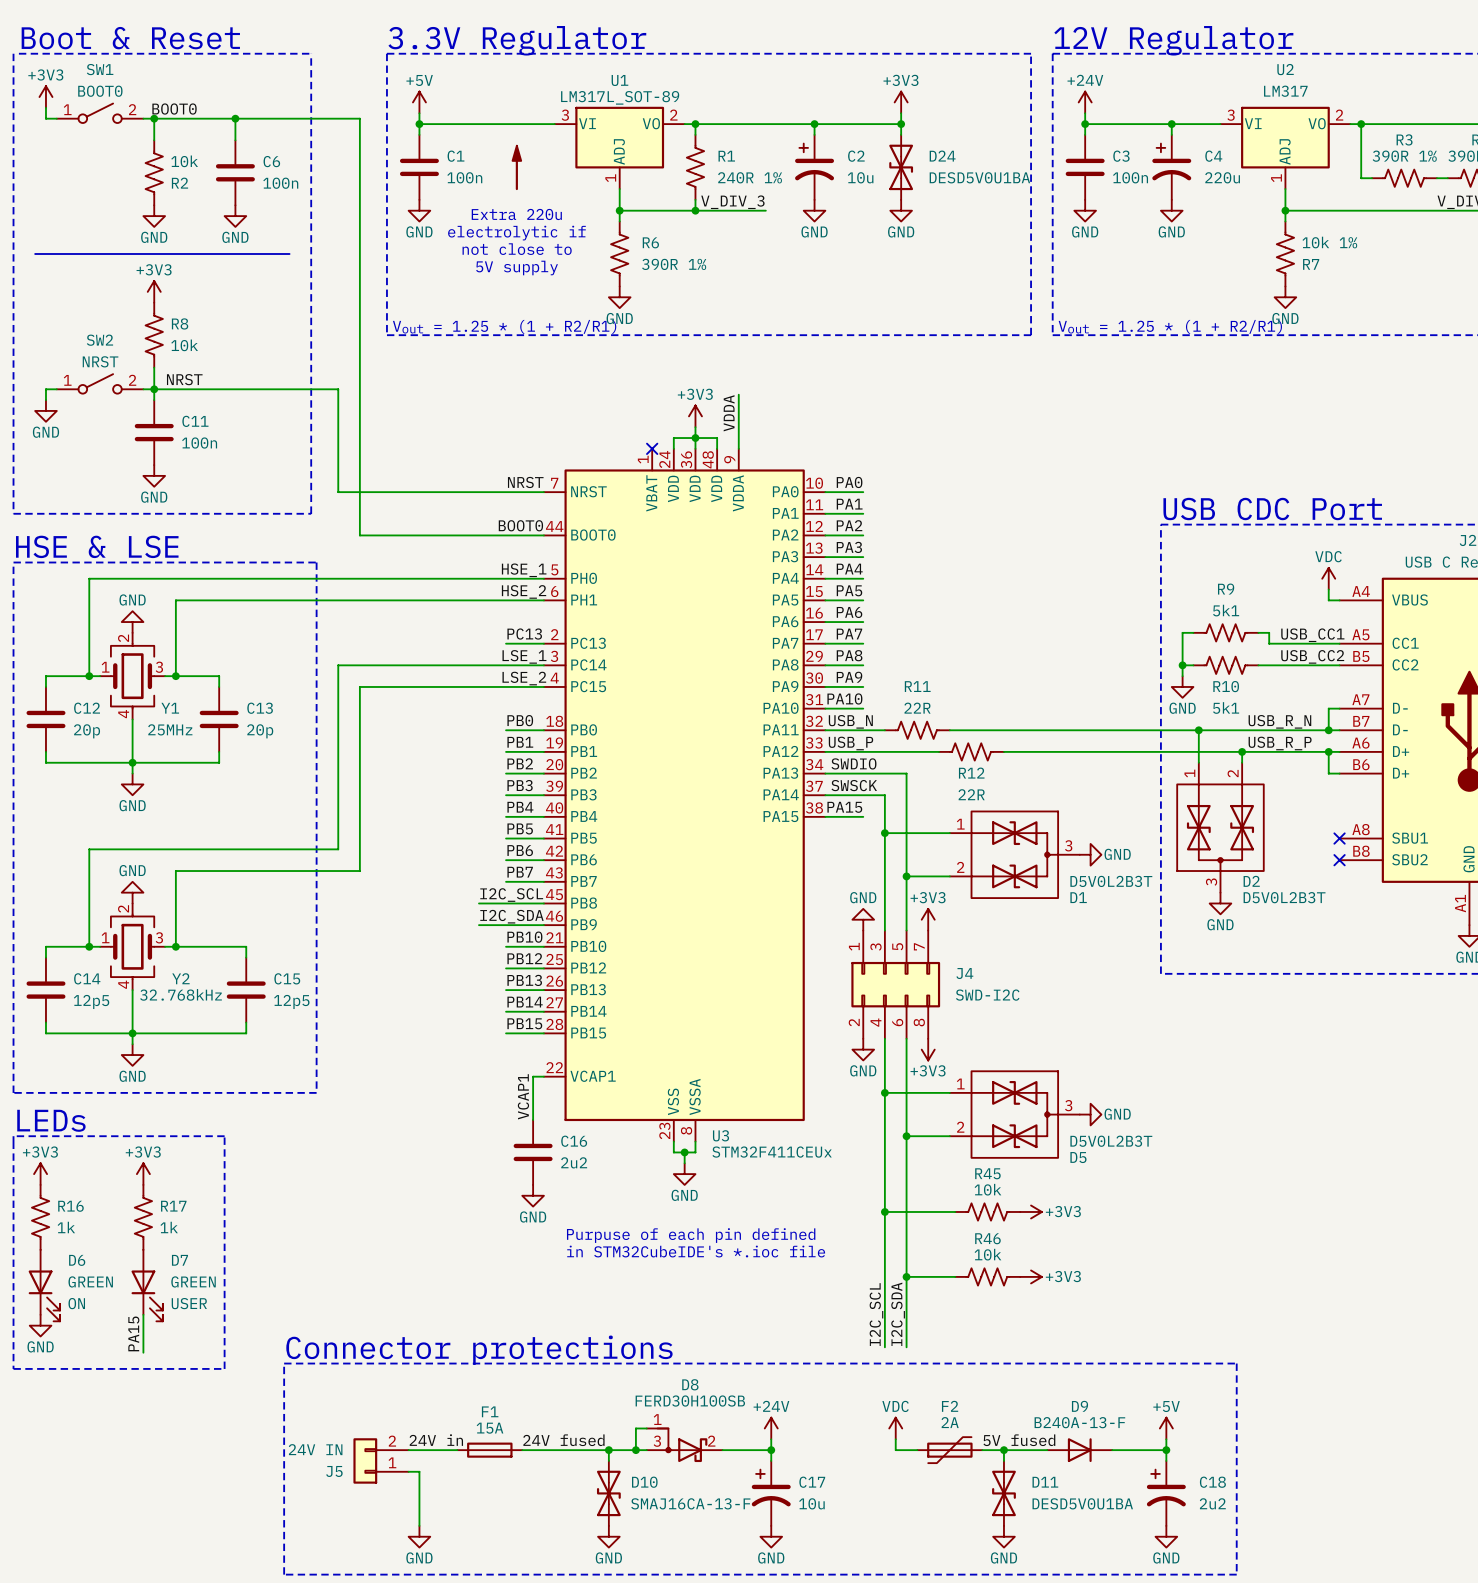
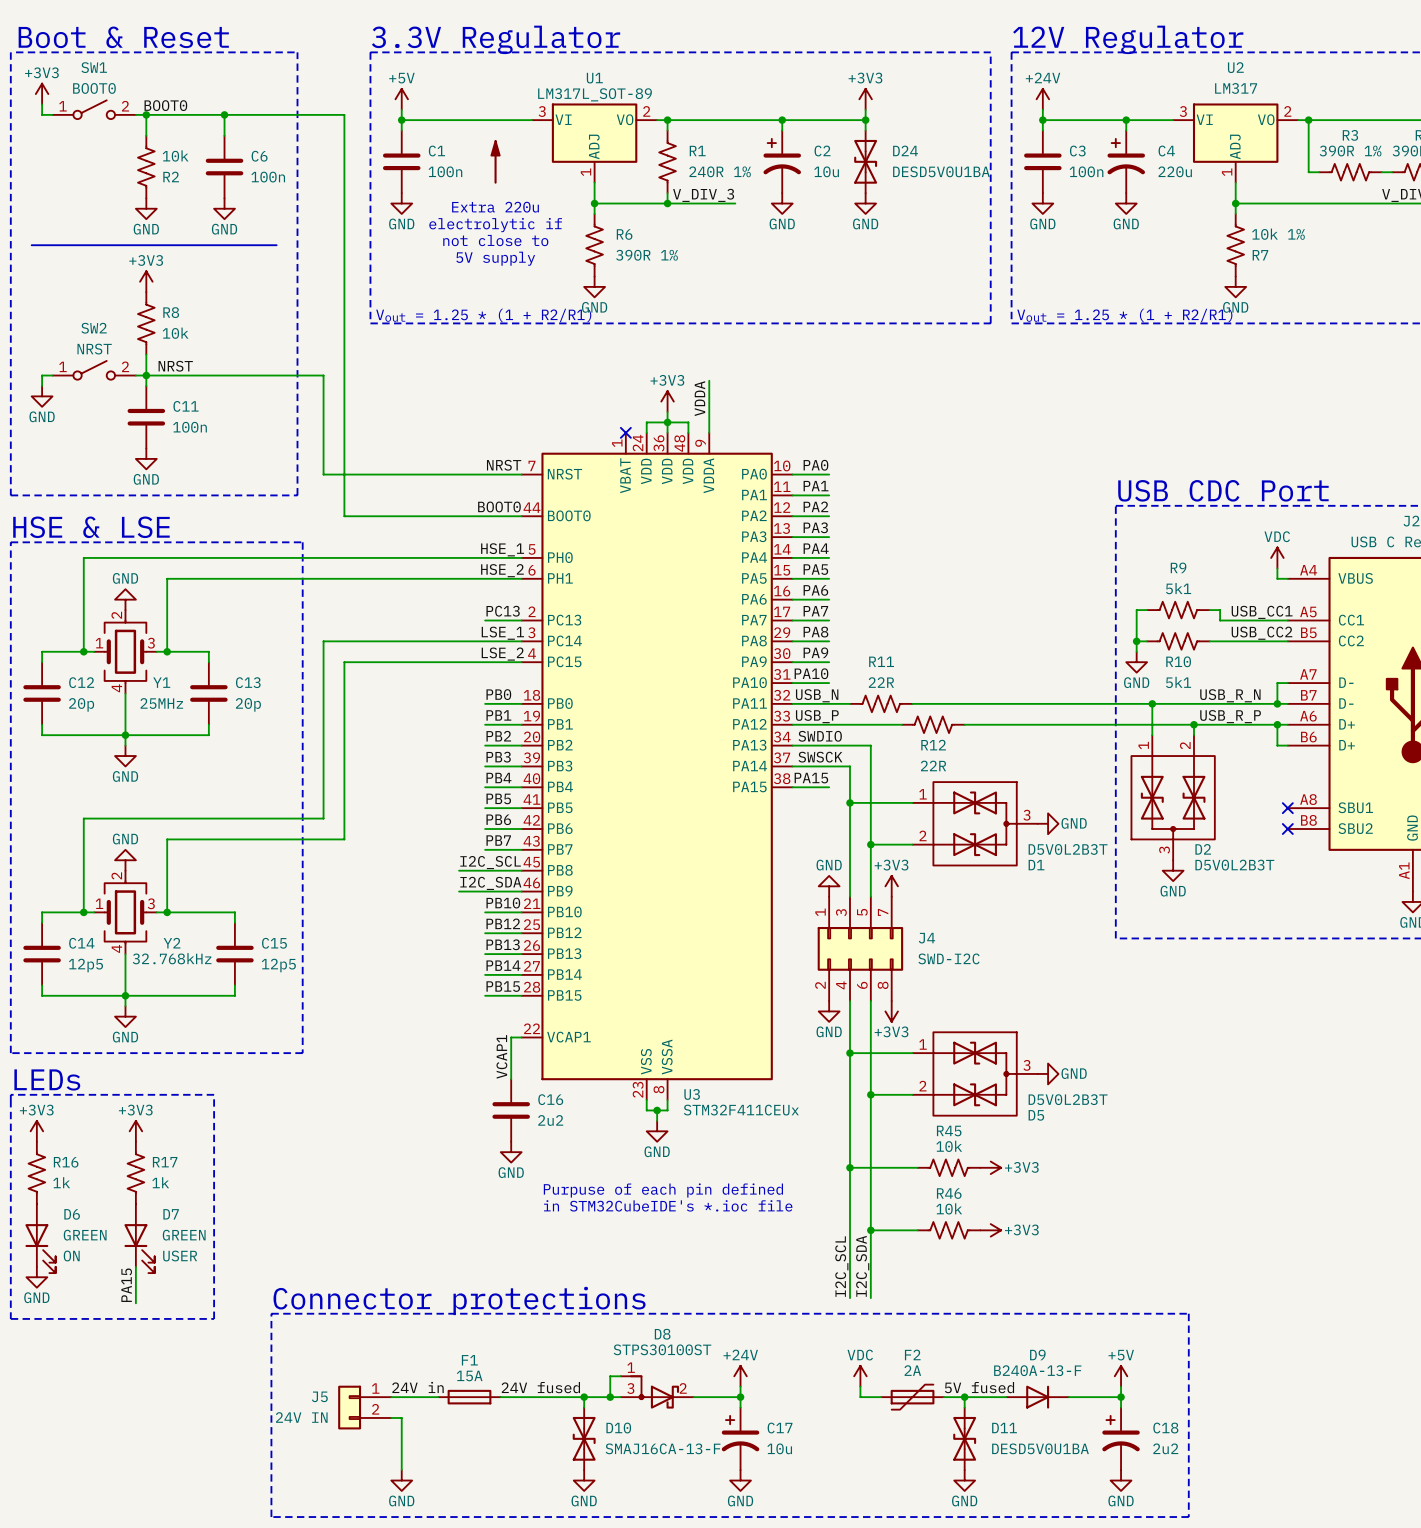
D8 value: FERD30H100SB (690, 1401) -> STPS30100ST (662, 1349)
J5 flip: as is (365, 1460) -> up-down (349, 1407)

